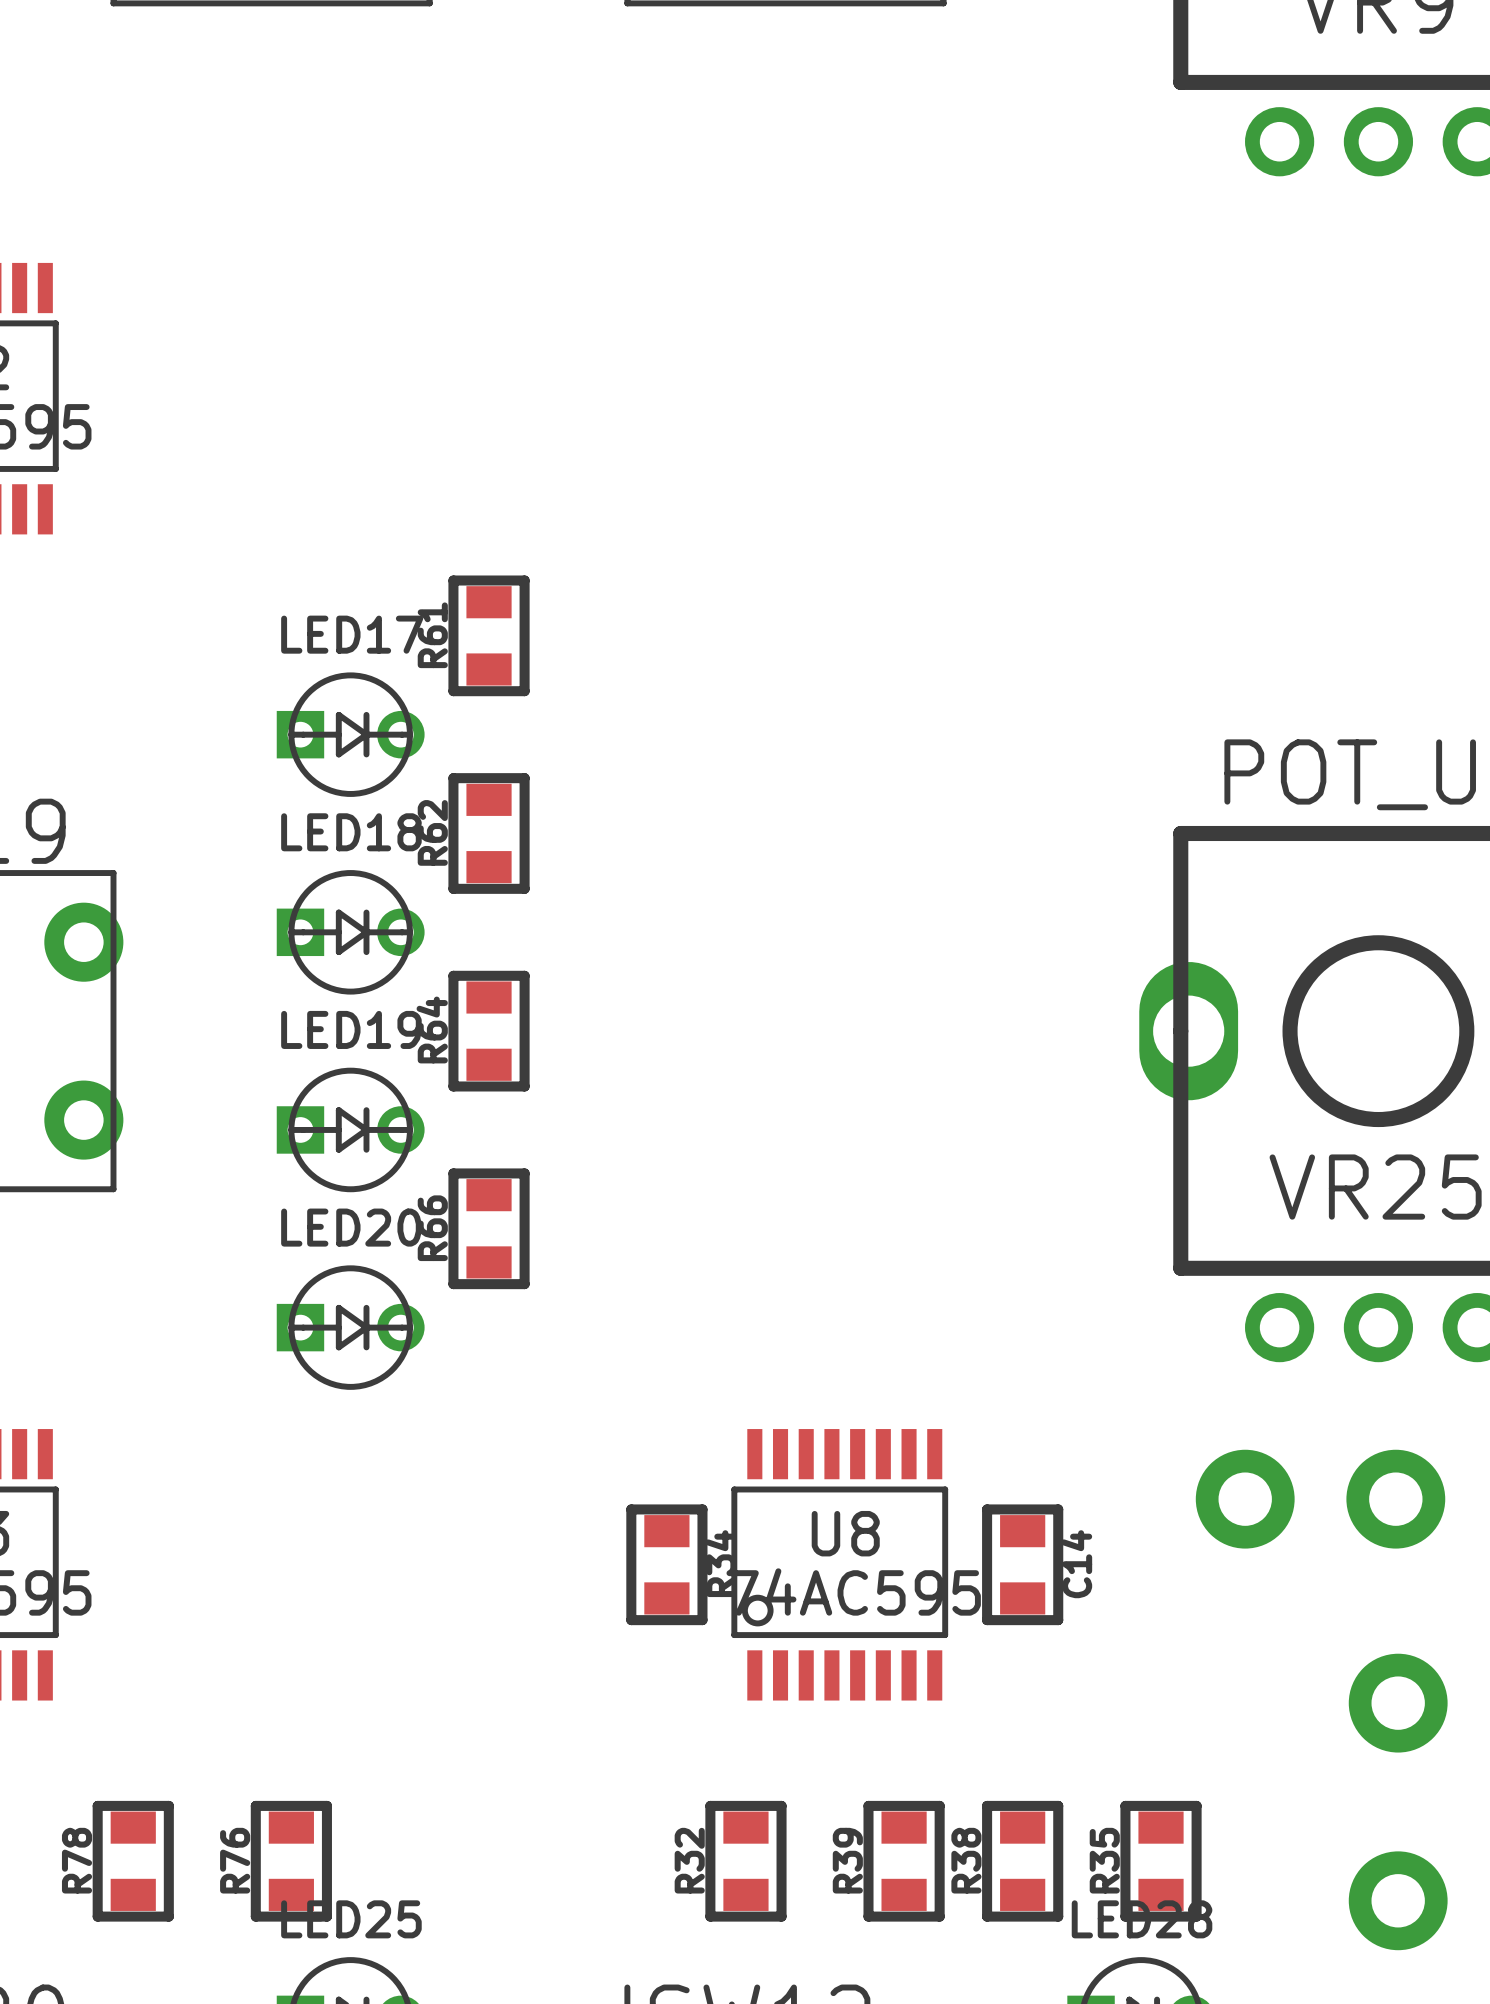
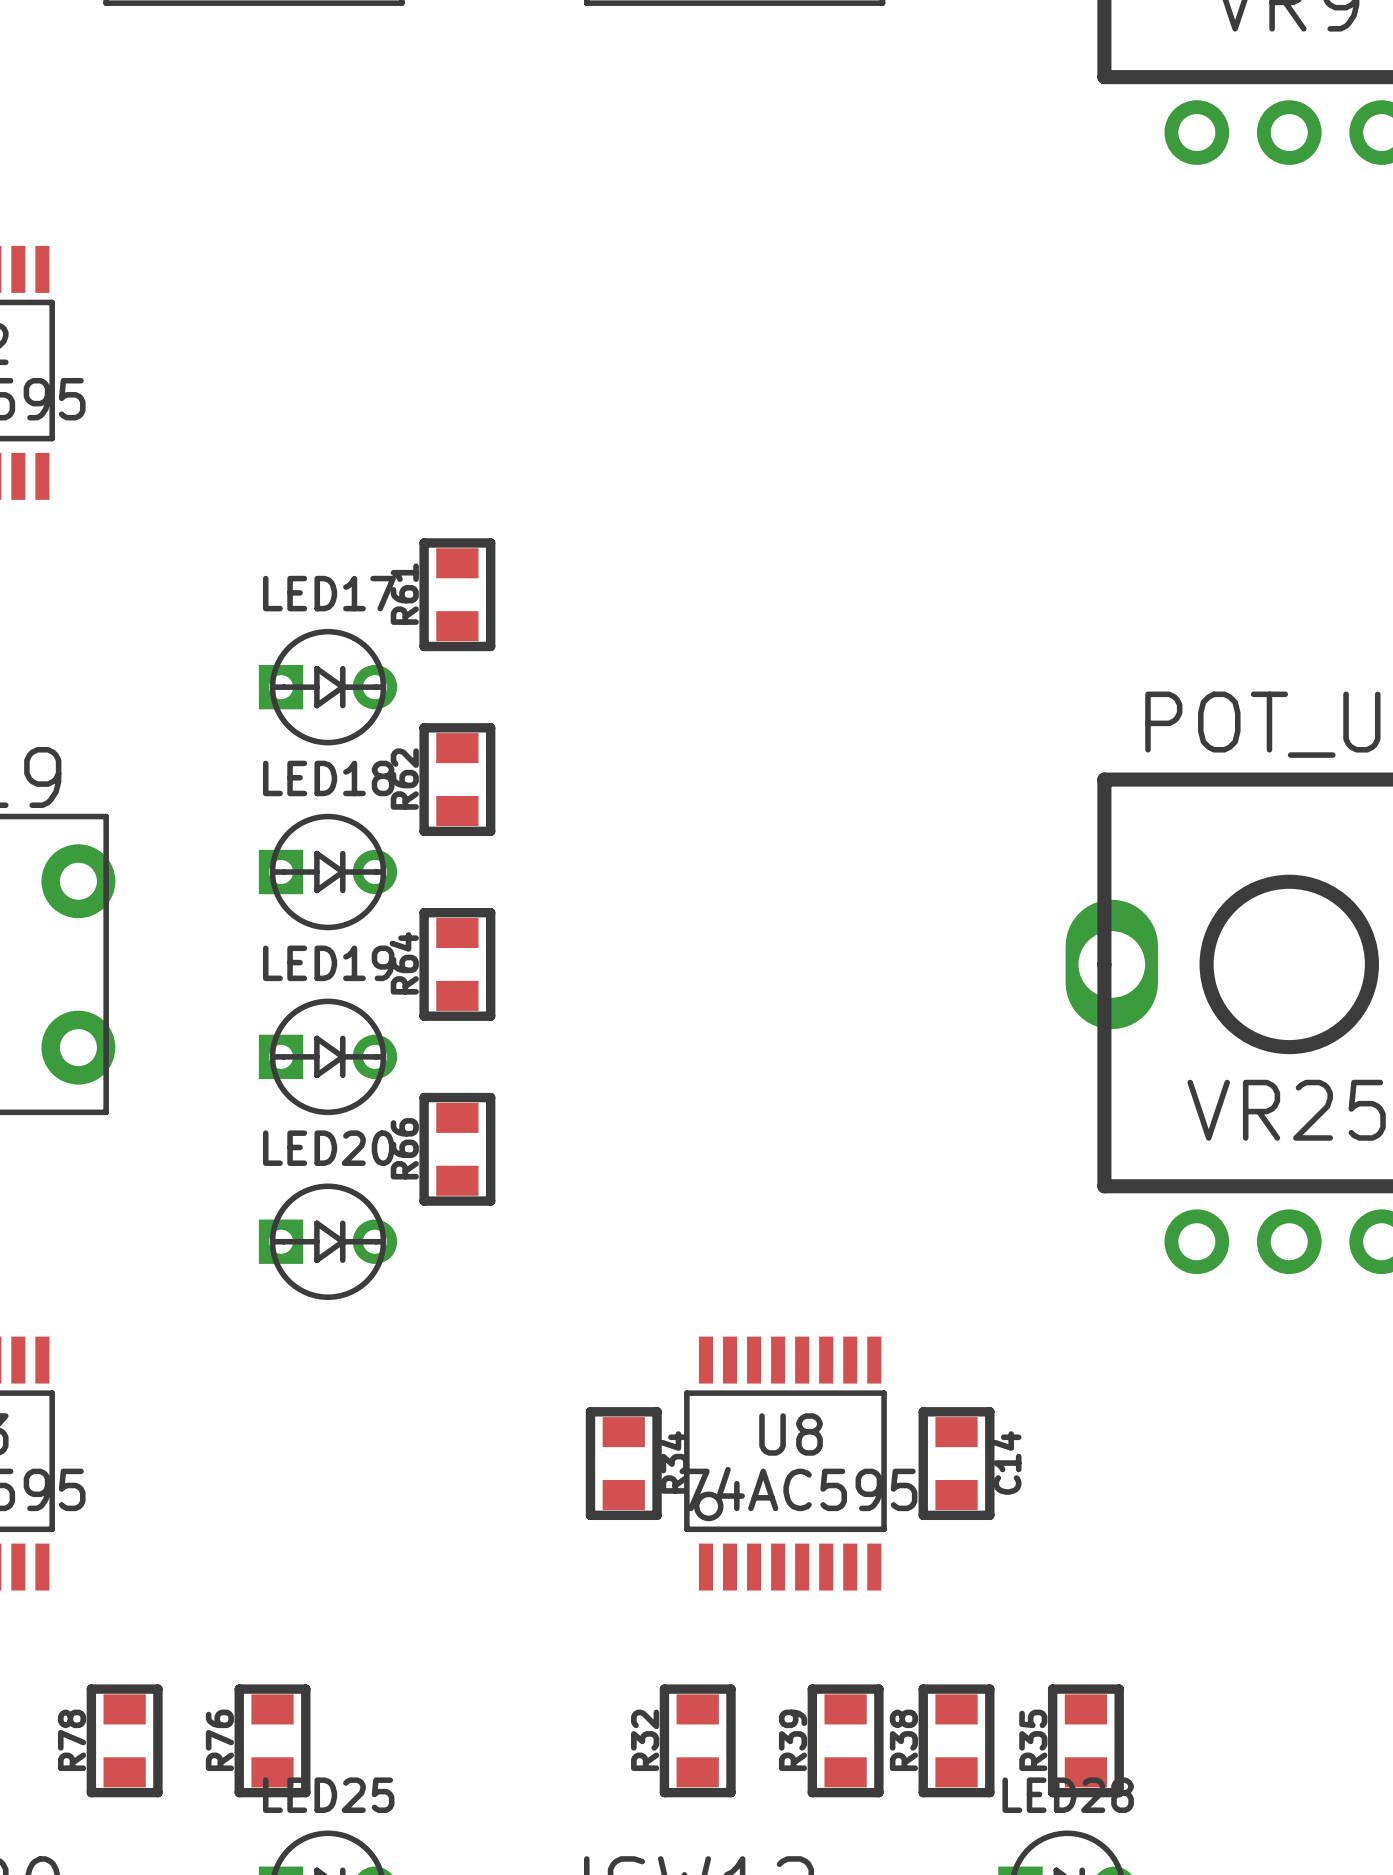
part: (1245, 1499) -> none
part: (1395, 1499) -> none
part: (1398, 1703) -> none
part: (1398, 1900) -> none

